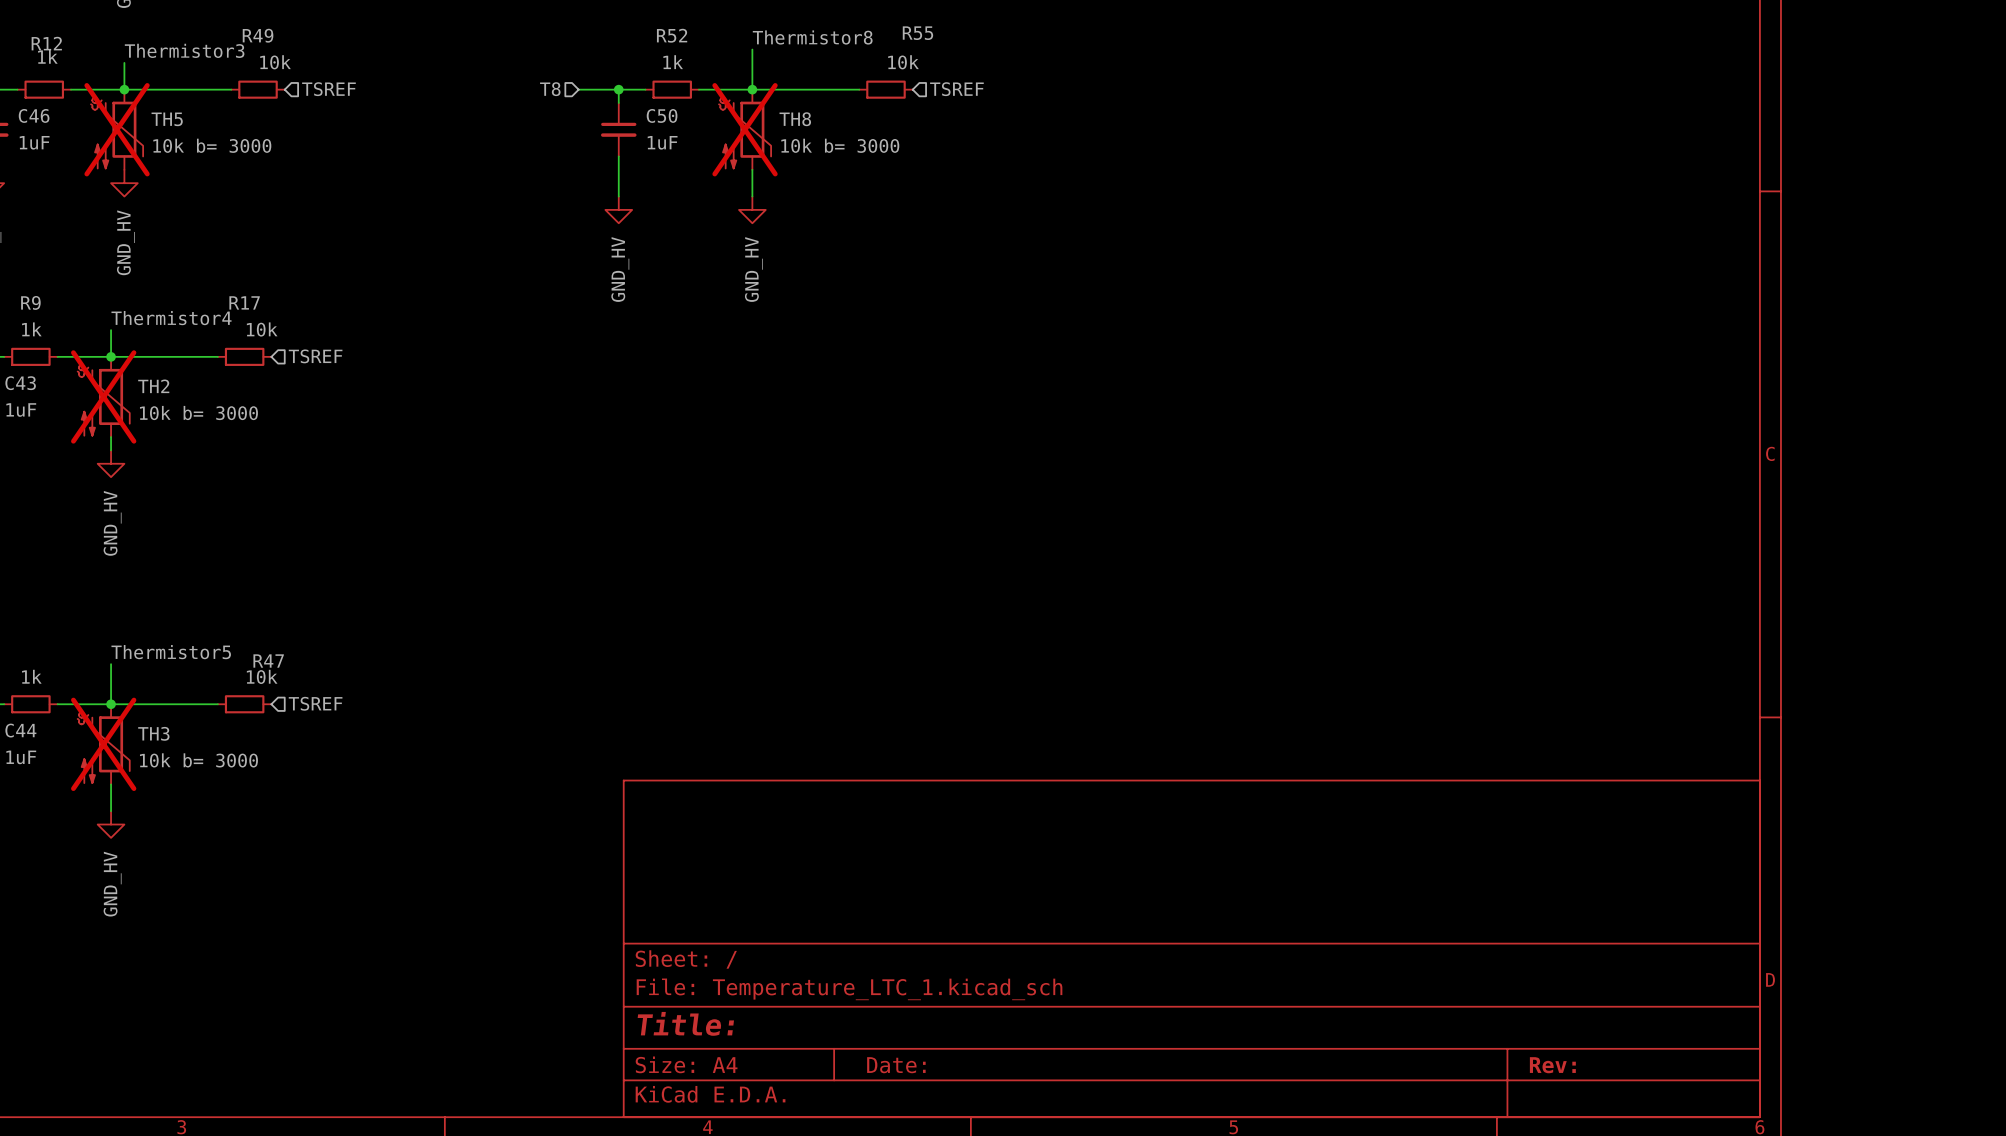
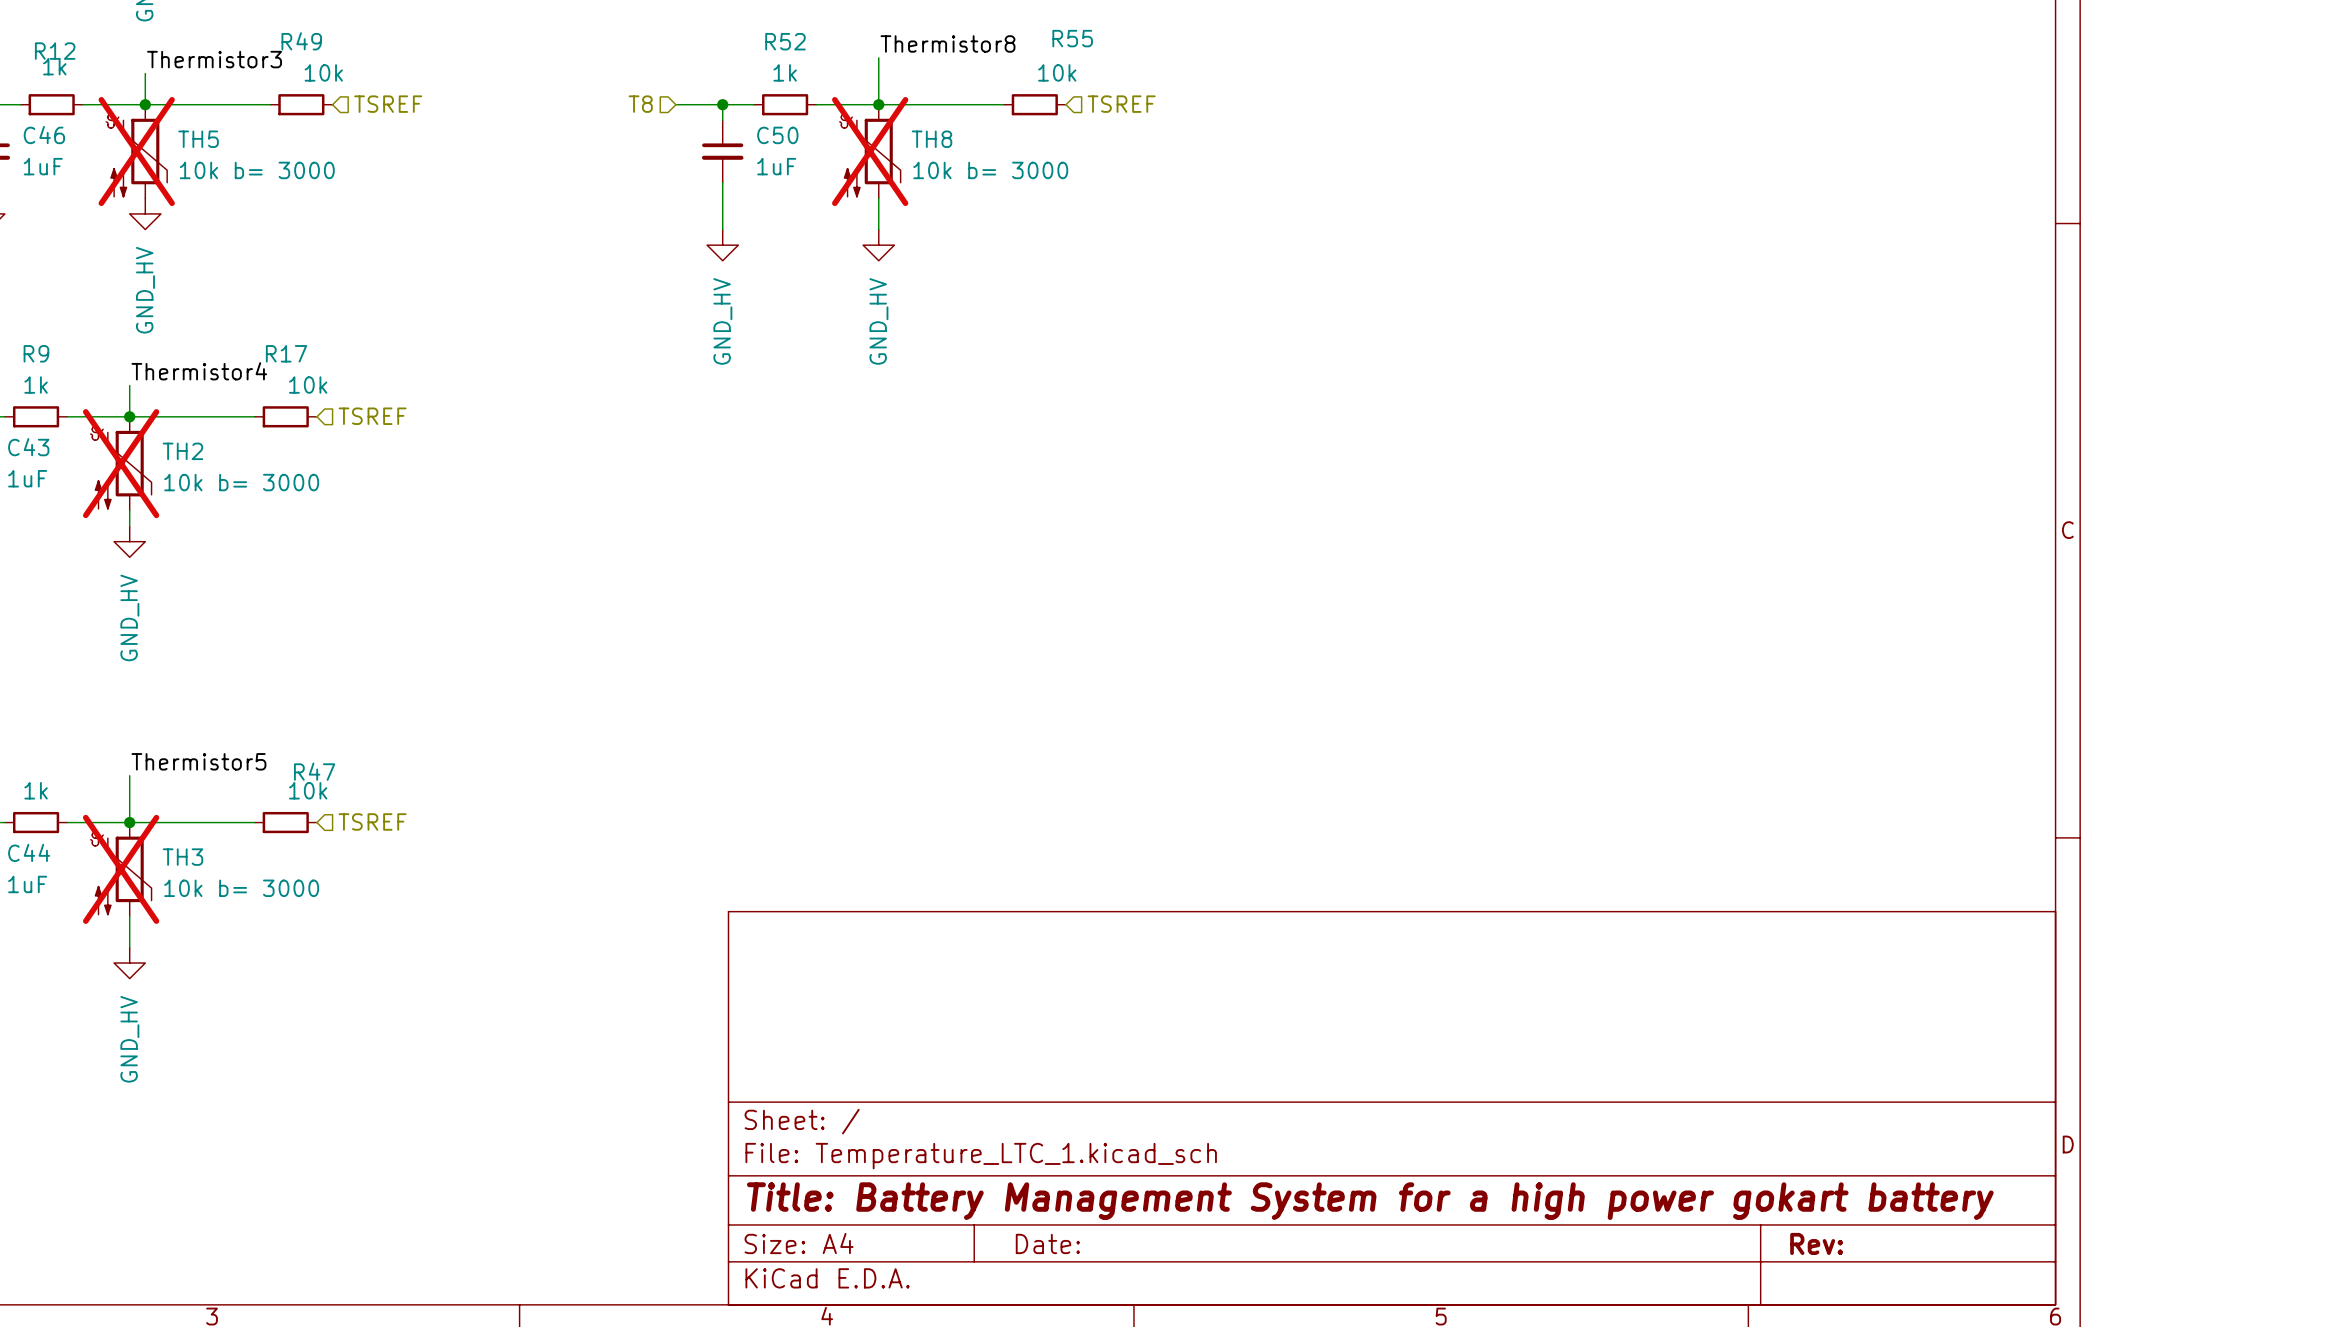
title block: Title: (685, 1023) -> Title: Battery Management System for a high power gokart battery (1370, 1201)

